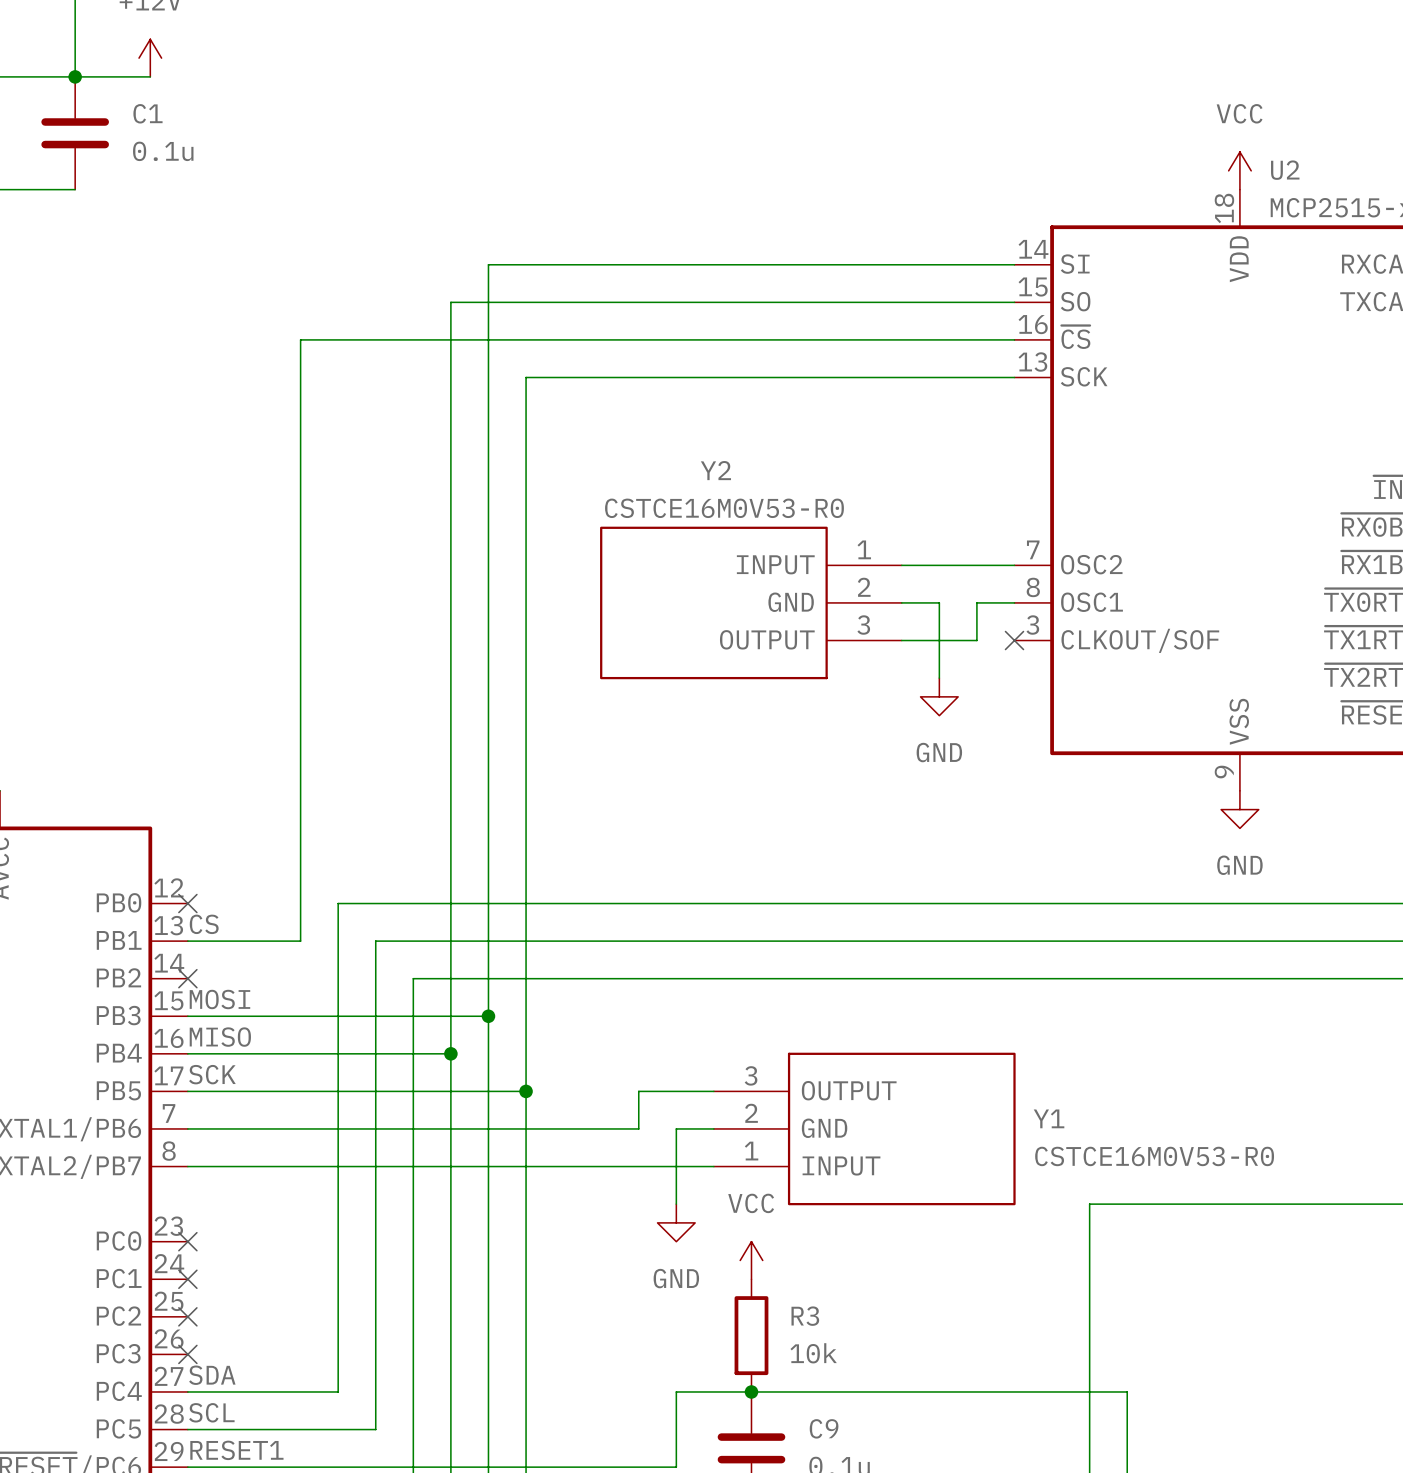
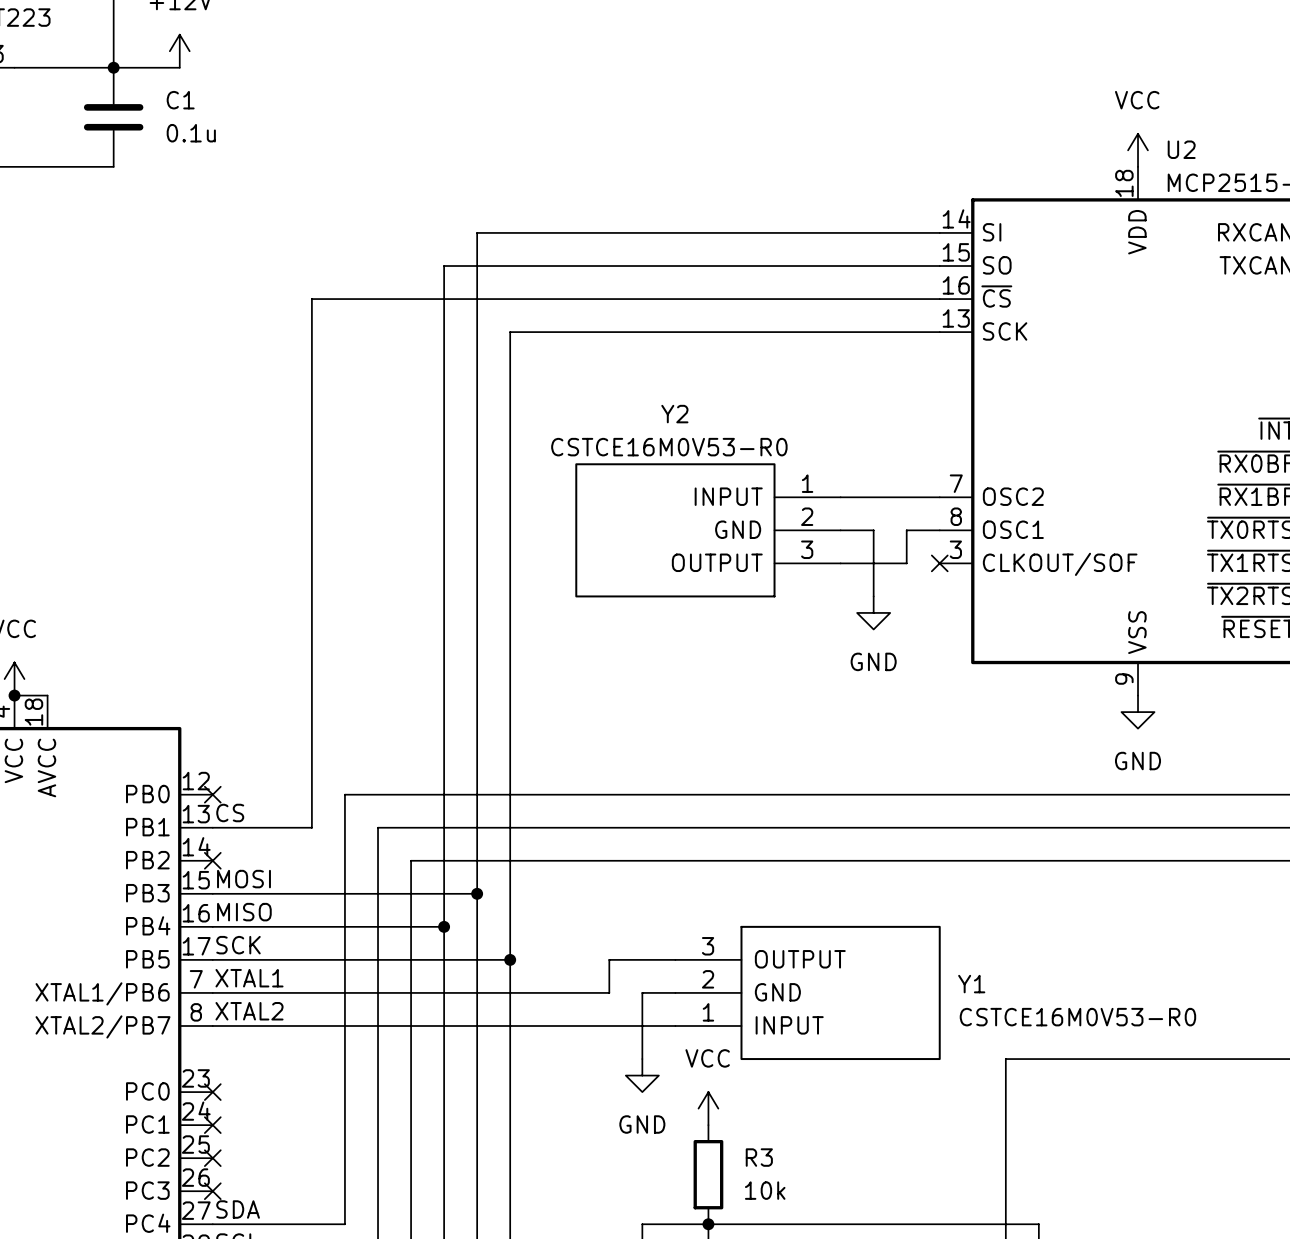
label: none -> XTAL1 (249, 978)
label: none -> XTAL2 (249, 1011)

